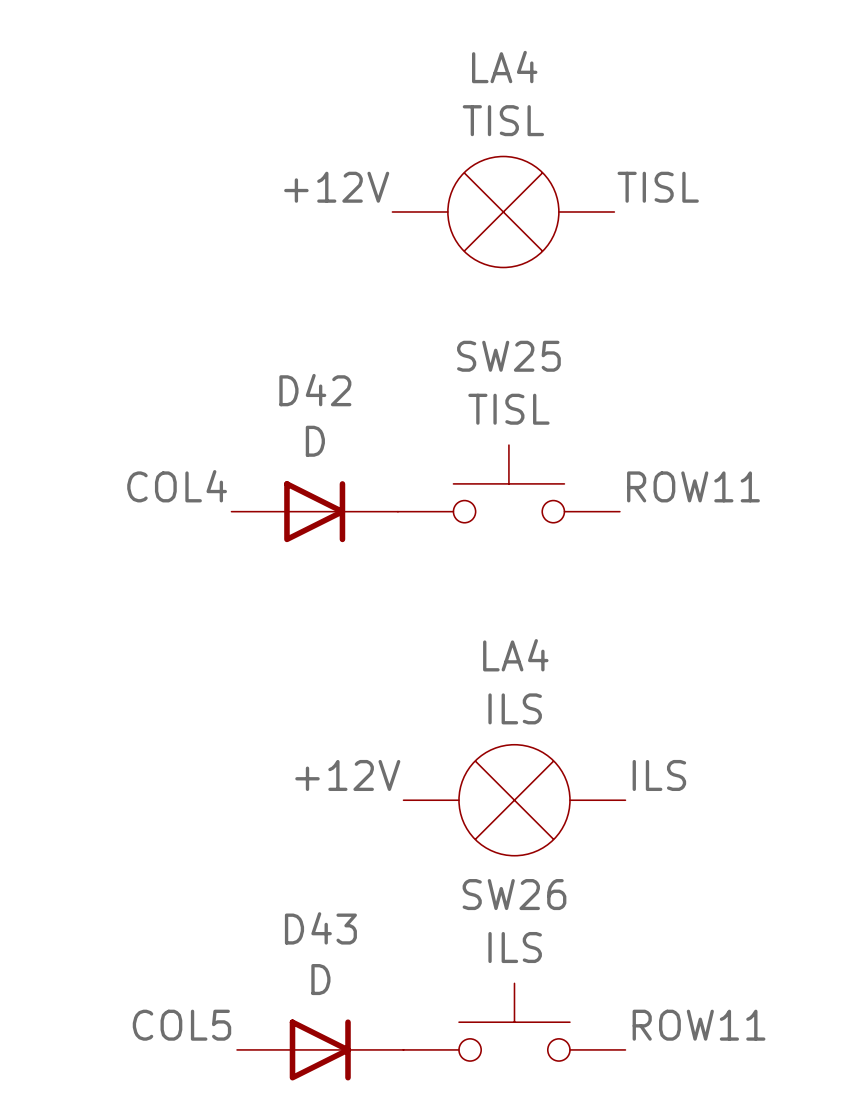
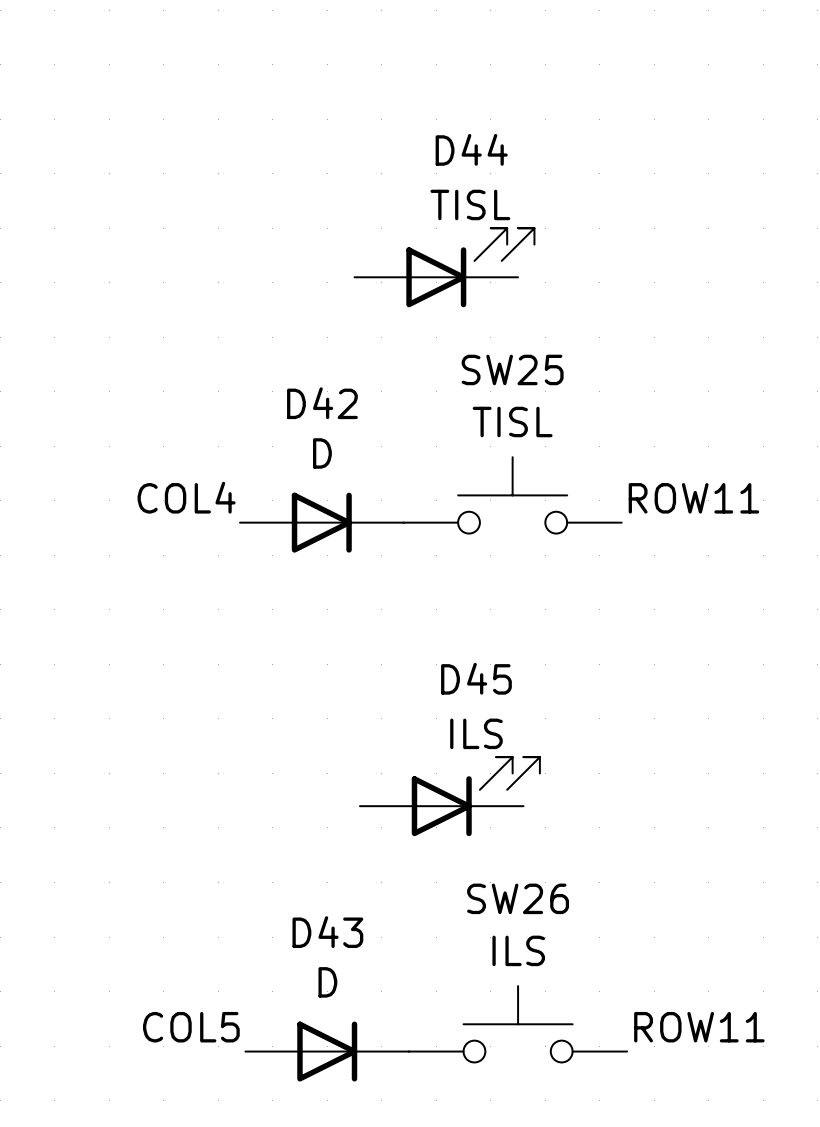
label: +12V (336, 187) -> none
label: TISL (658, 187) -> none
LA4: TISL (503, 211) -> none
D44: none -> TISL (444, 267)
label: +12V (347, 775) -> none
label: ILS (659, 775) -> none
D45: none -> ILS (449, 796)
LA4: ILS (514, 800) -> none

